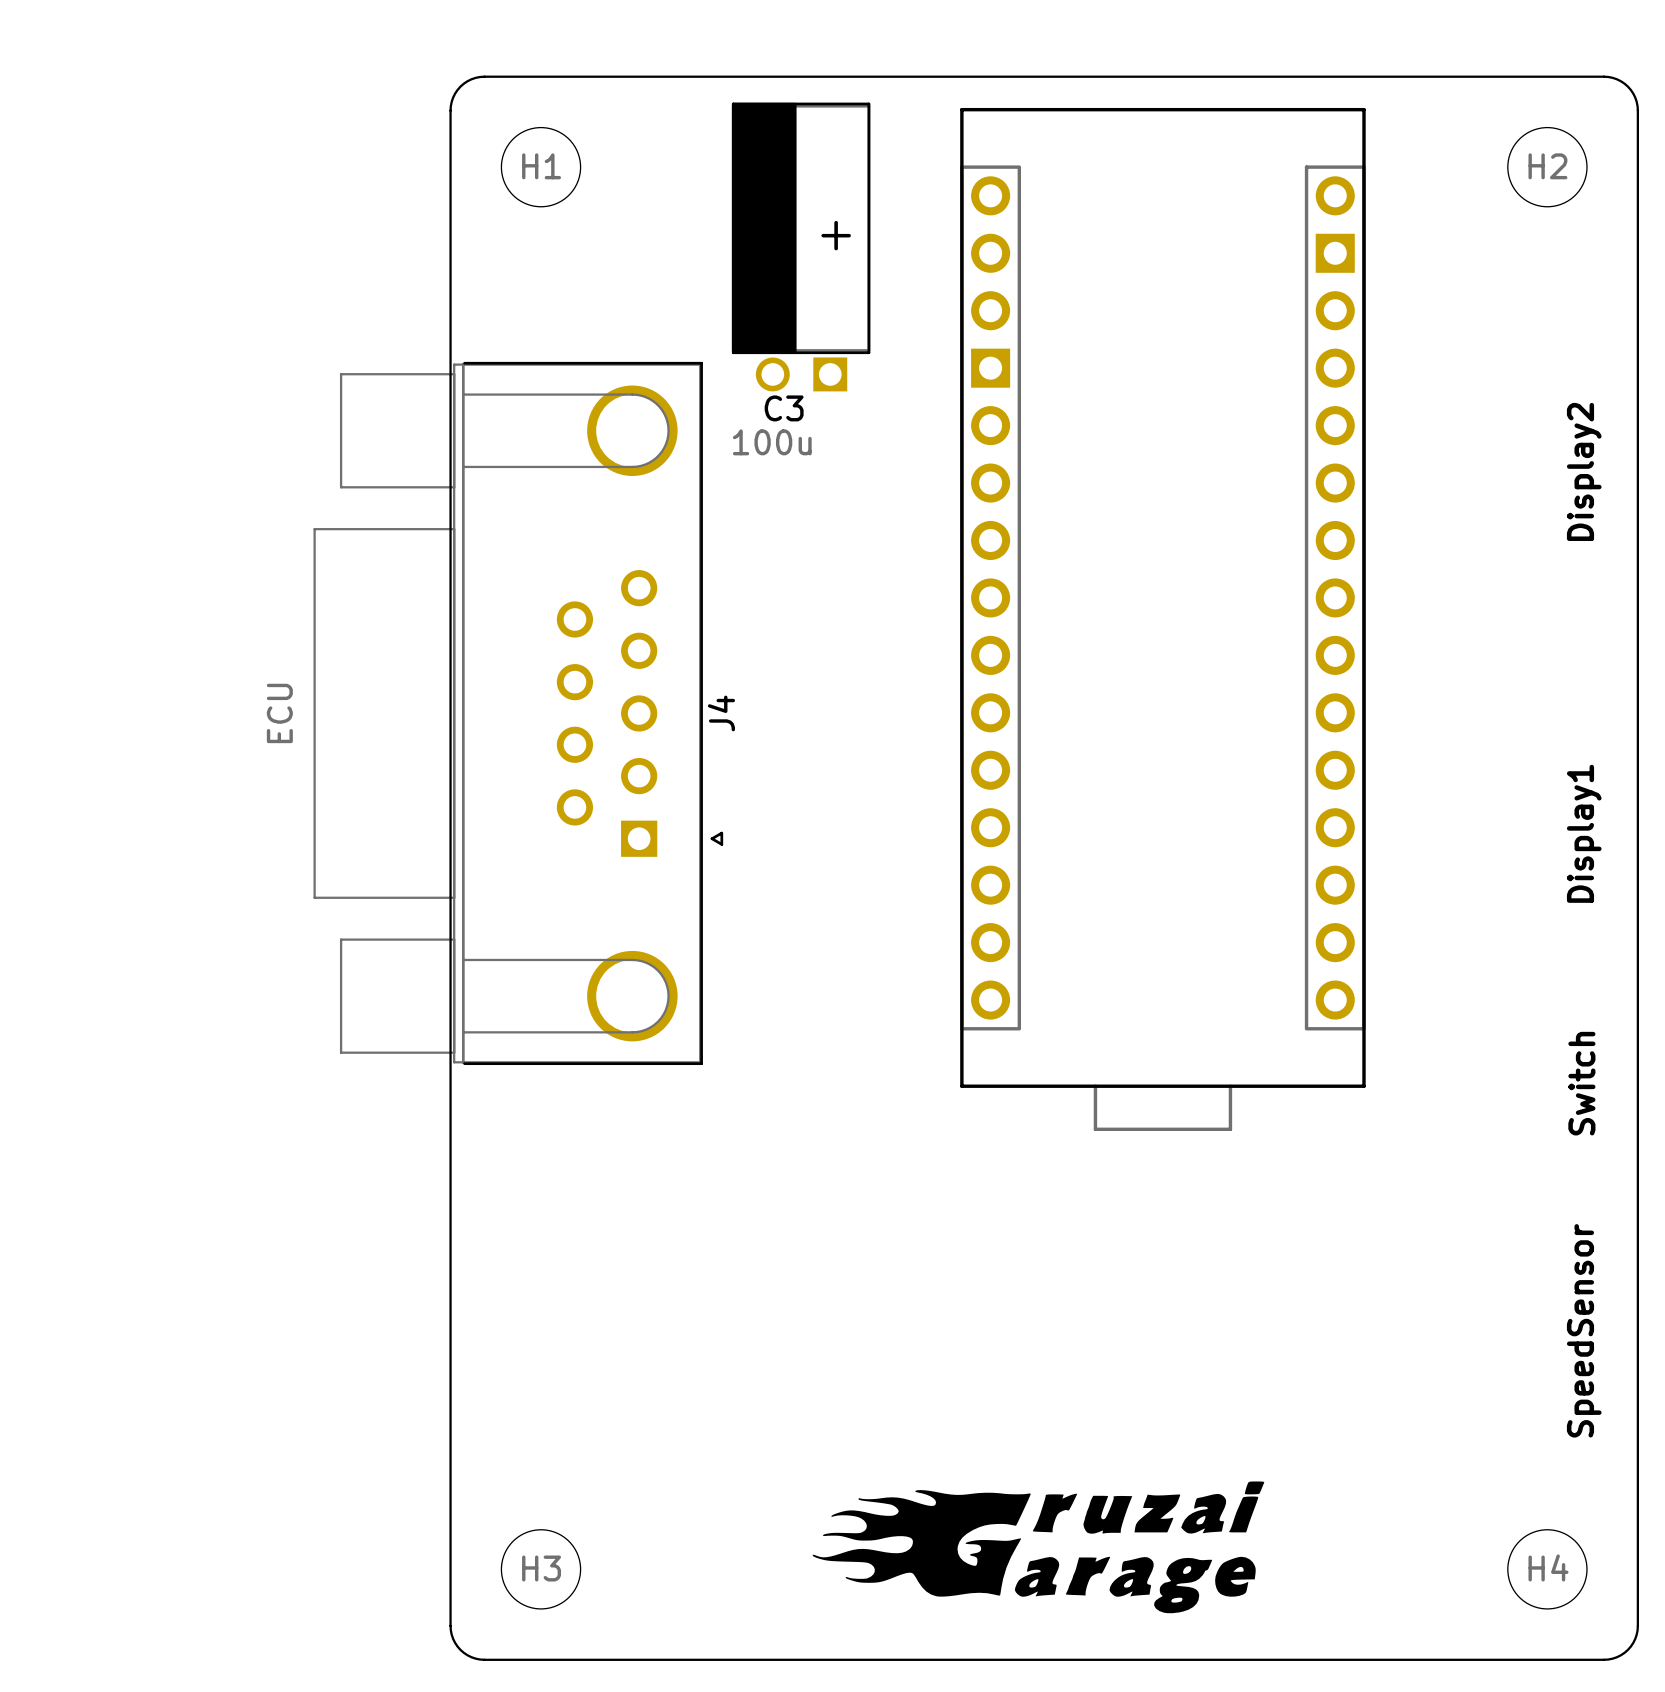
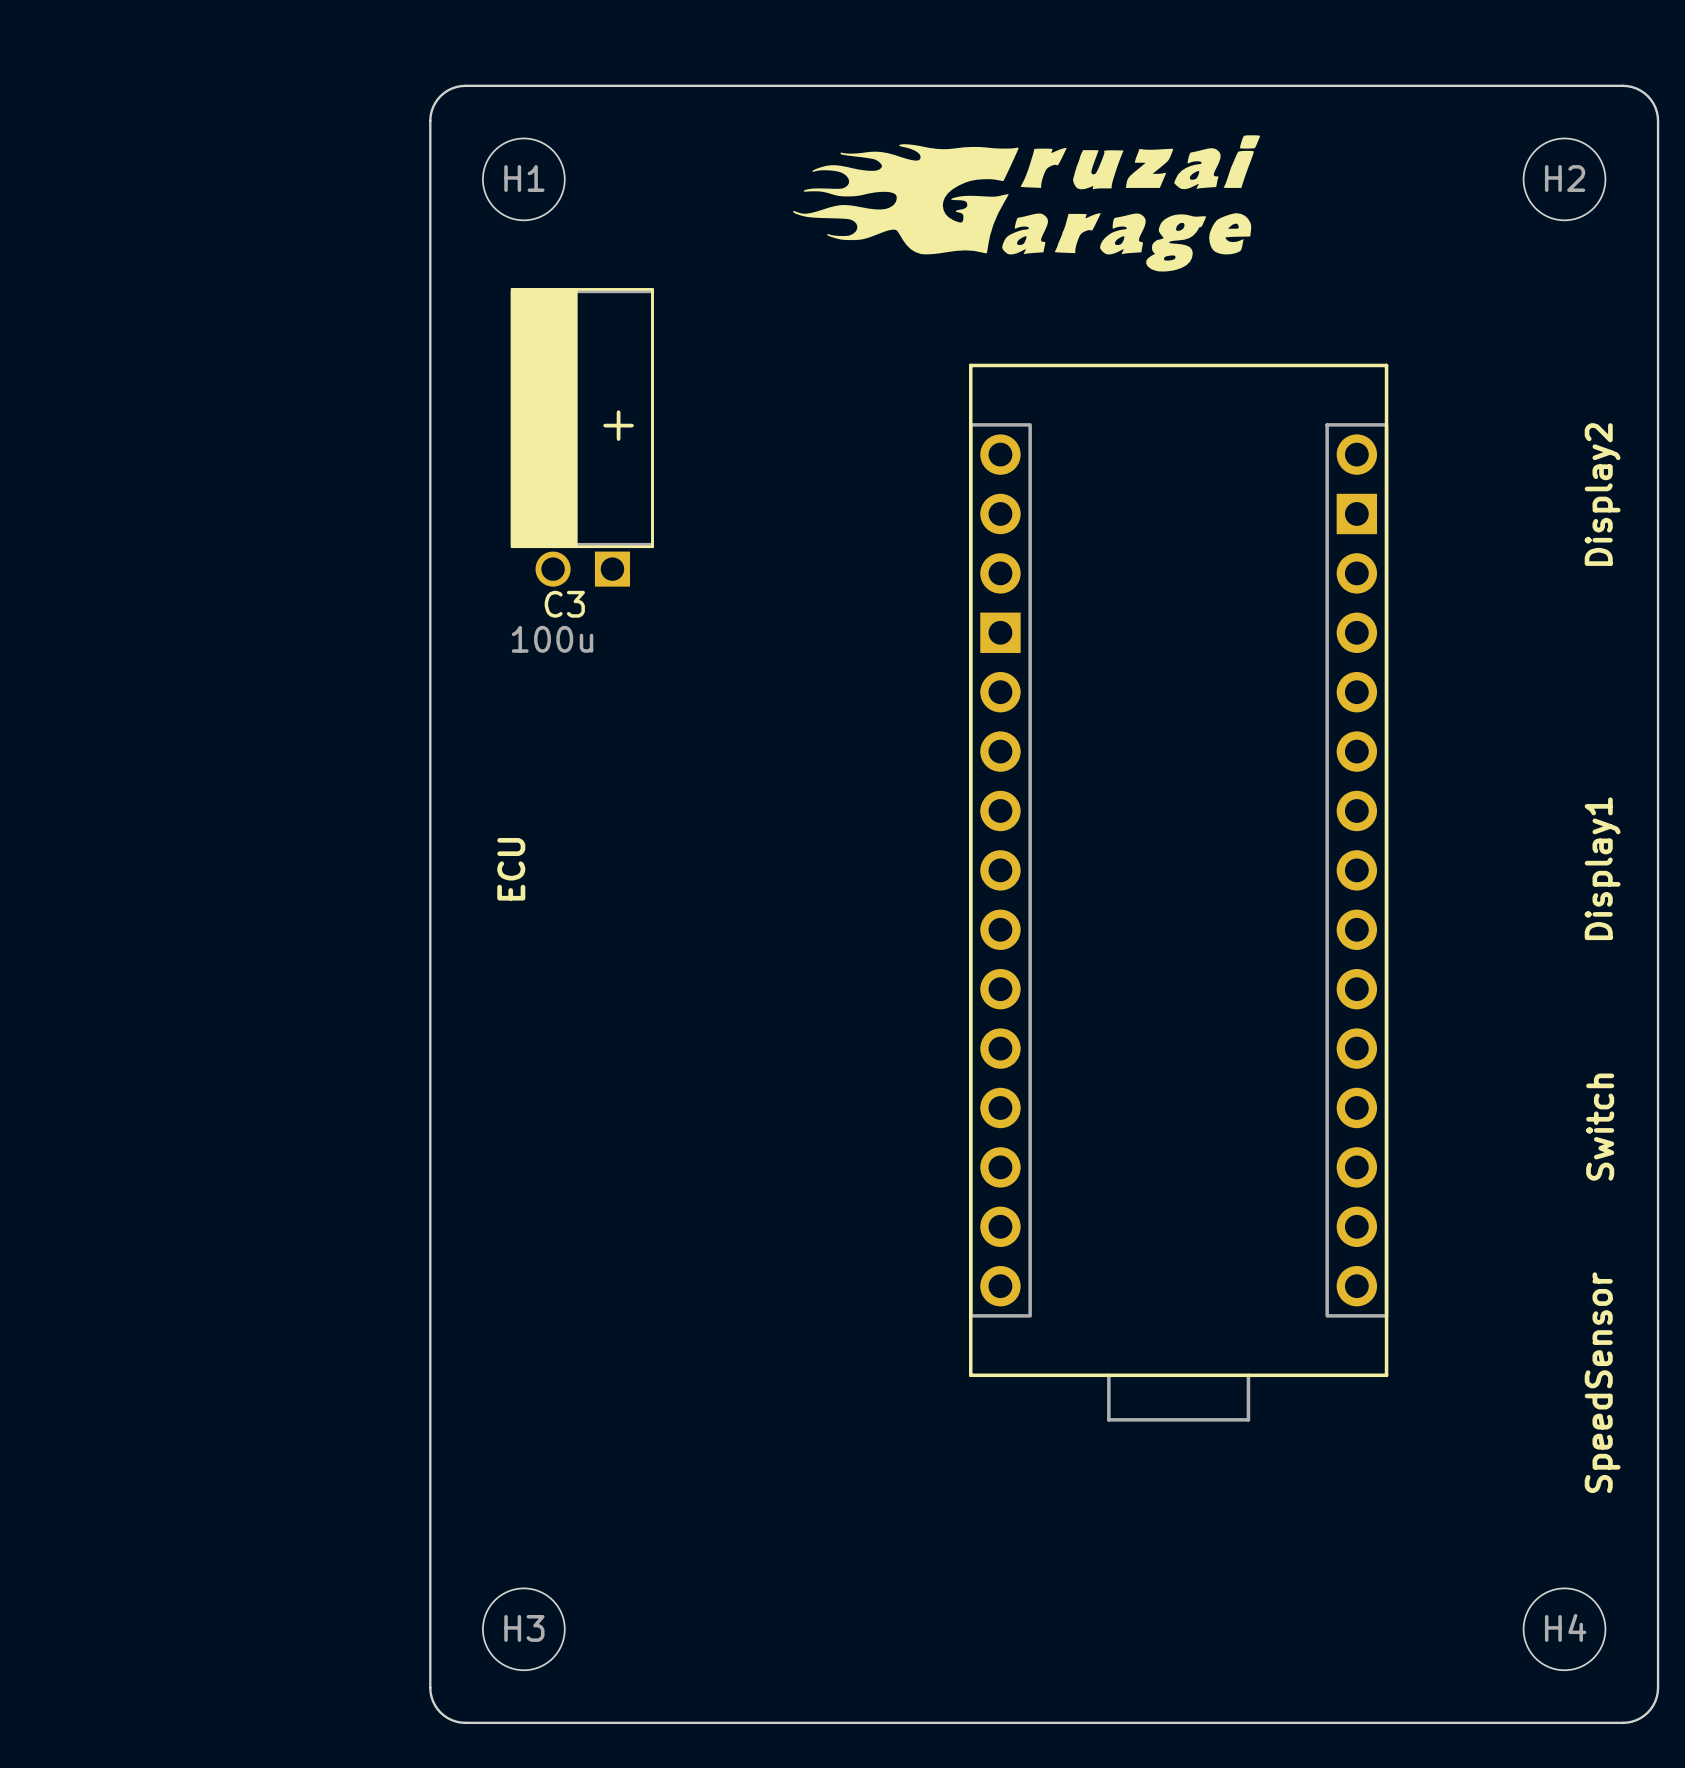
drawing: none -> [793, 135, 1261, 272]
C3 position: (801, 247) -> (582, 437)
part position: (1162, 619) -> (1178, 892)
J4: ECU (518, 713) -> none
part: none -> ECU (511, 869)
drawing: [812, 1481, 1265, 1614] -> none

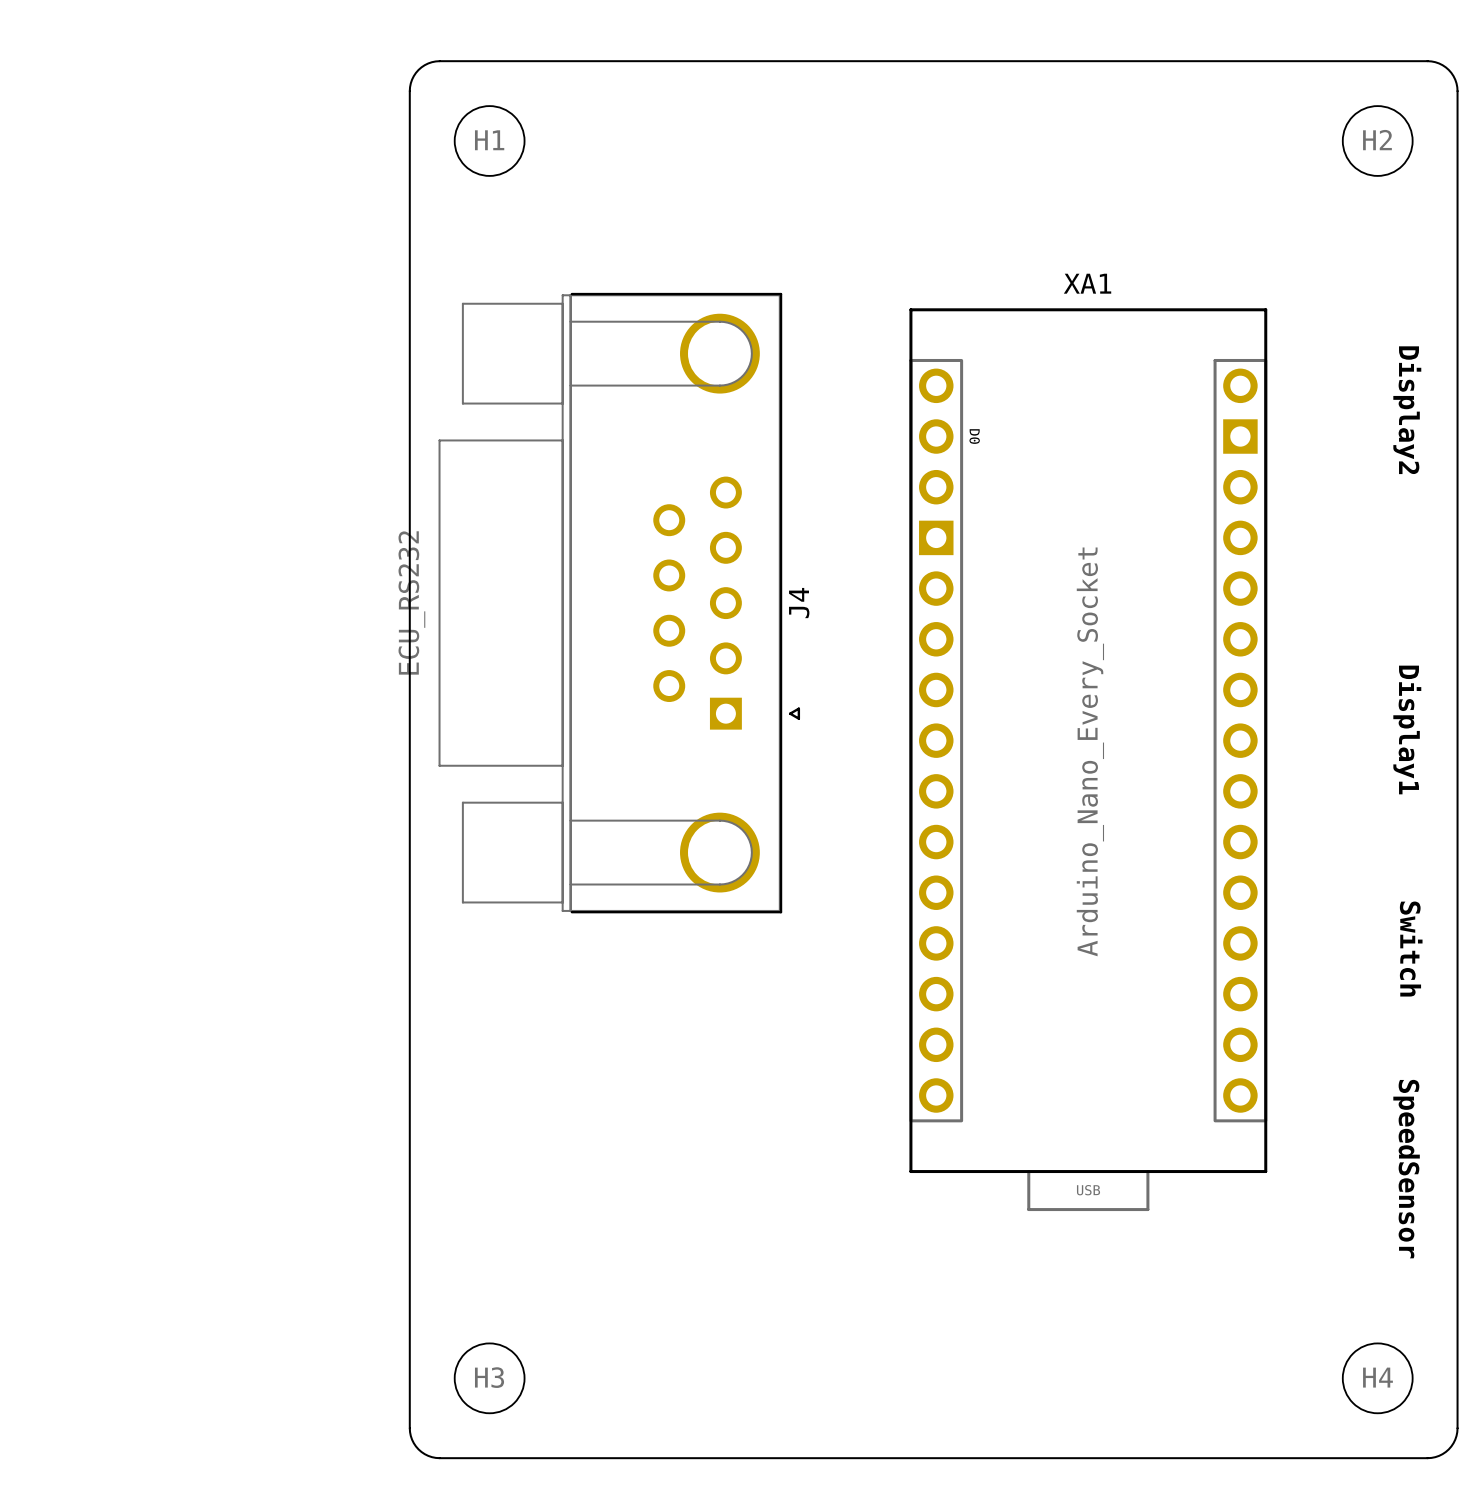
drawing: [793, 135, 1261, 272] -> none
C3: 100u (582, 437) -> none
part value rotation: 0° (1602, 494) -> 180° (1407, 410)
J4: none -> ECU_RS232 (619, 603)
part value rotation: 0° (1602, 868) -> 180° (1407, 729)
part: ECU (511, 869) -> none
part: (1178, 892) -> none
XA1: none -> Arduino_Nano_Every_Socket (1088, 759)
part value rotation: 0° (1600, 1127) -> 180° (1411, 949)
part value rotation: 0° (1602, 1382) -> 180° (1406, 1169)

